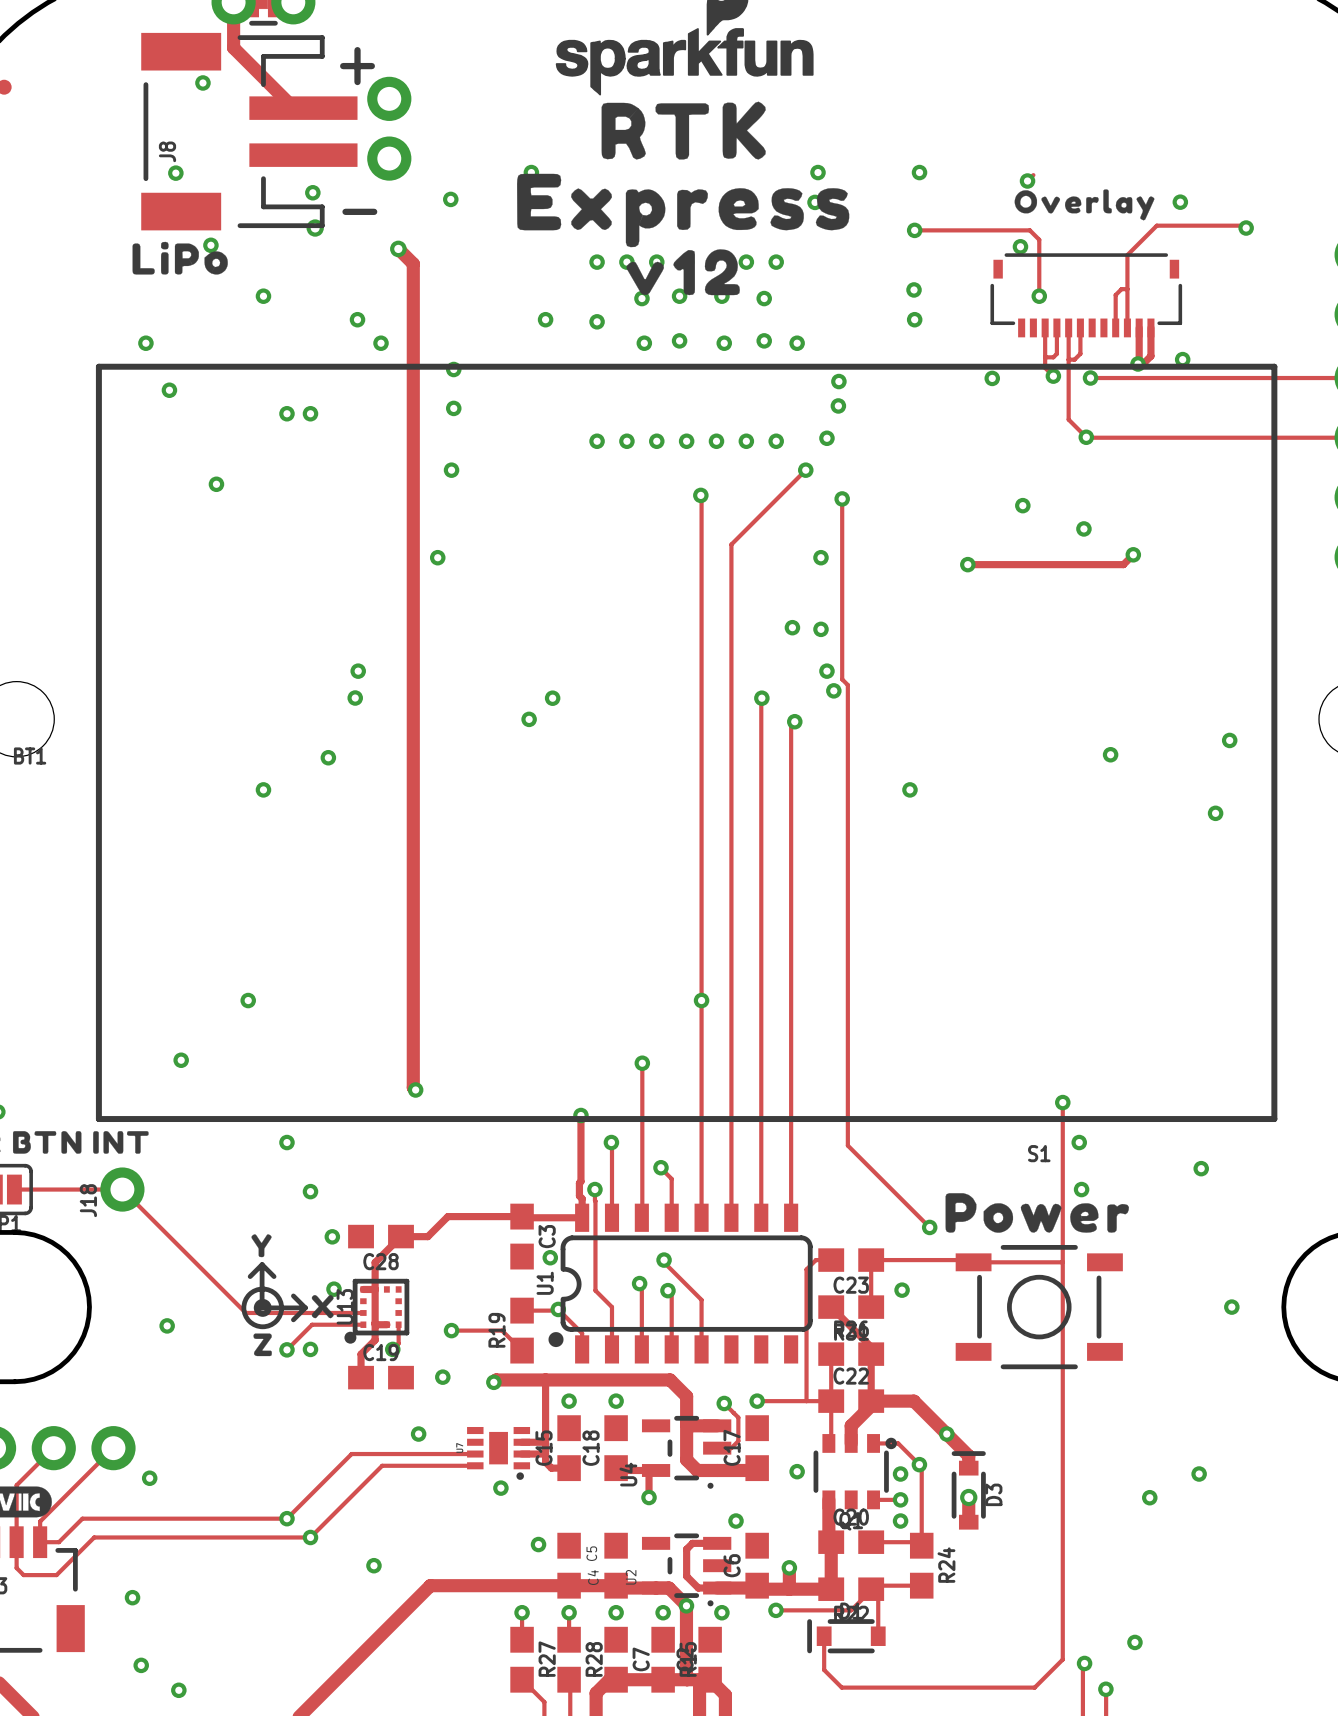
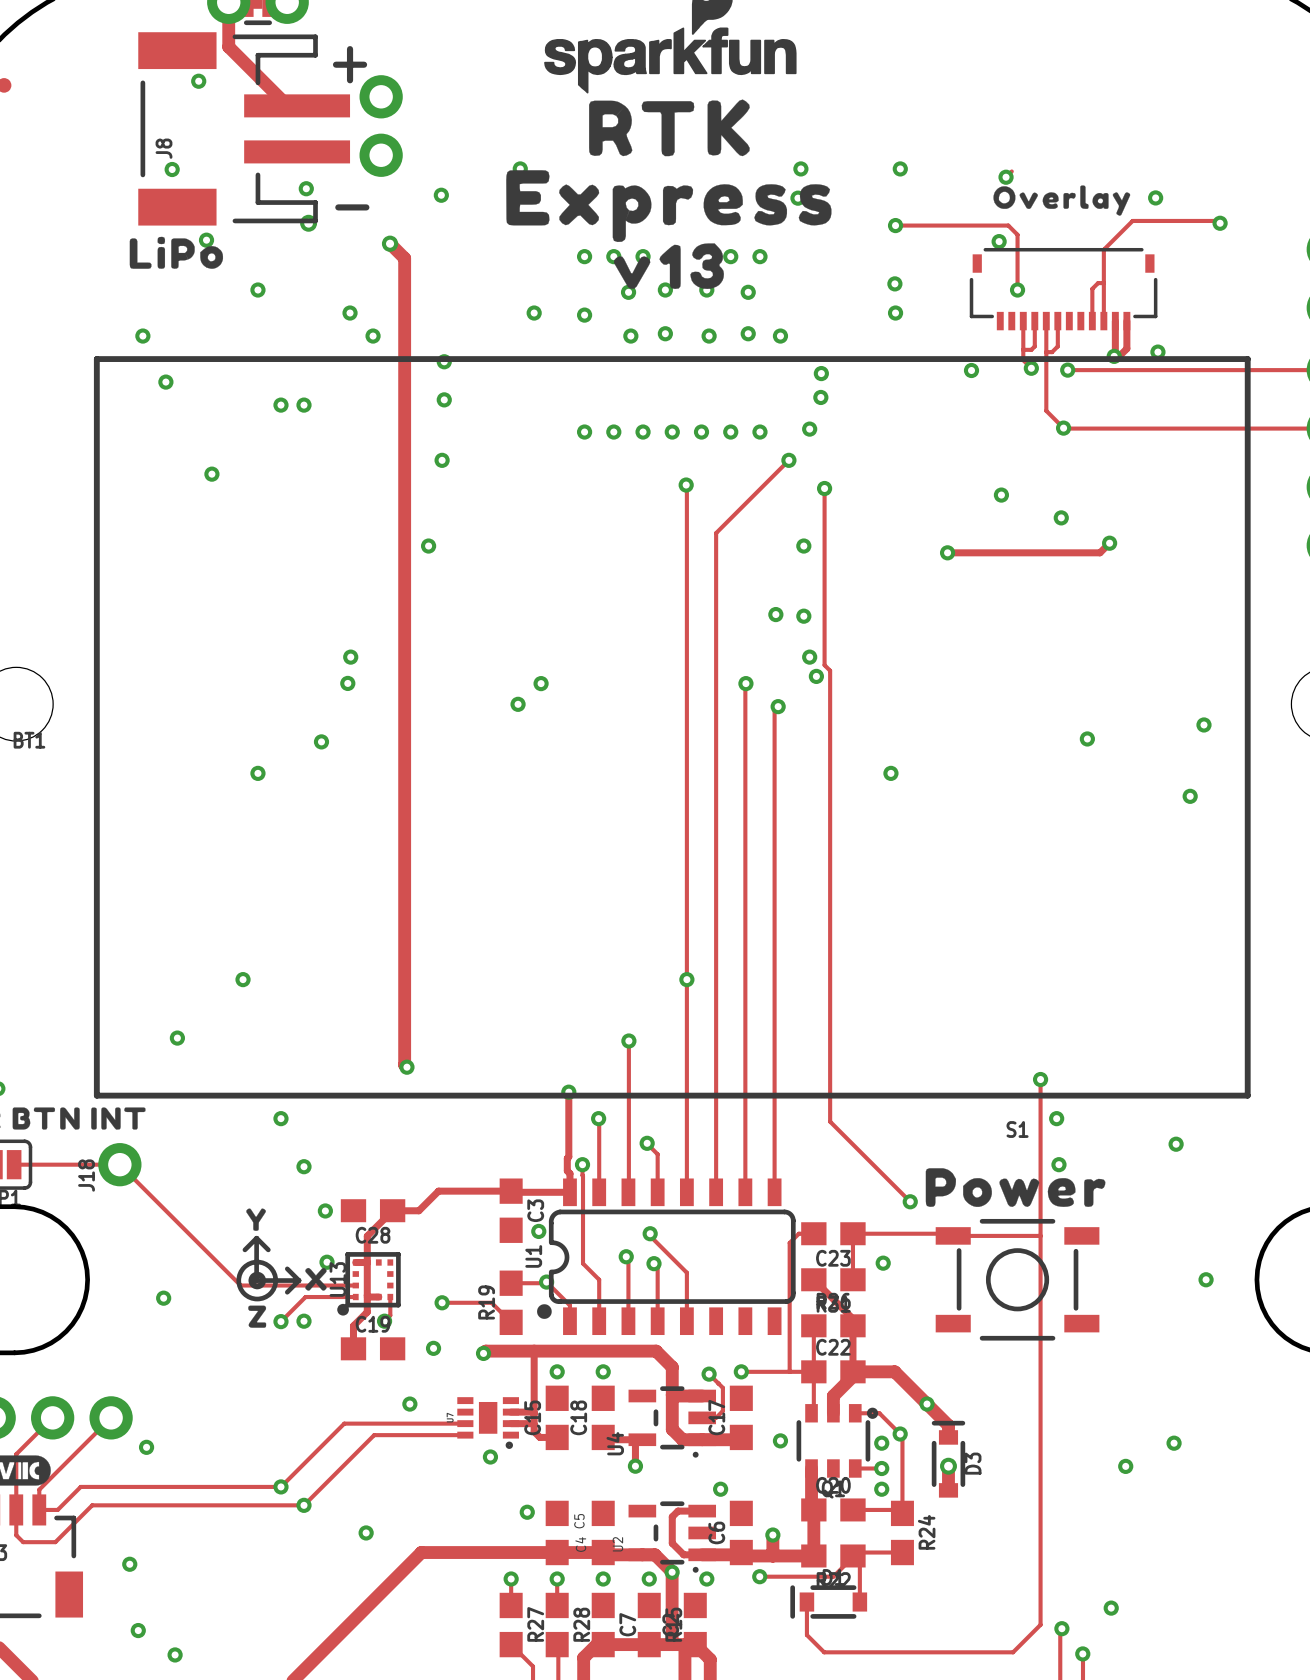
drawing shape: [626, 249, 740, 296] -> [613, 243, 724, 289]

